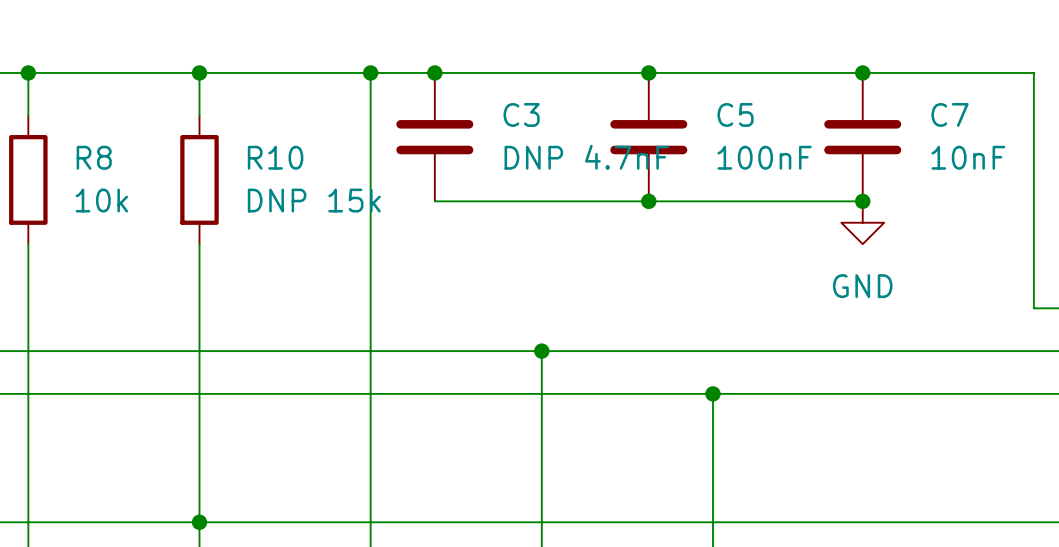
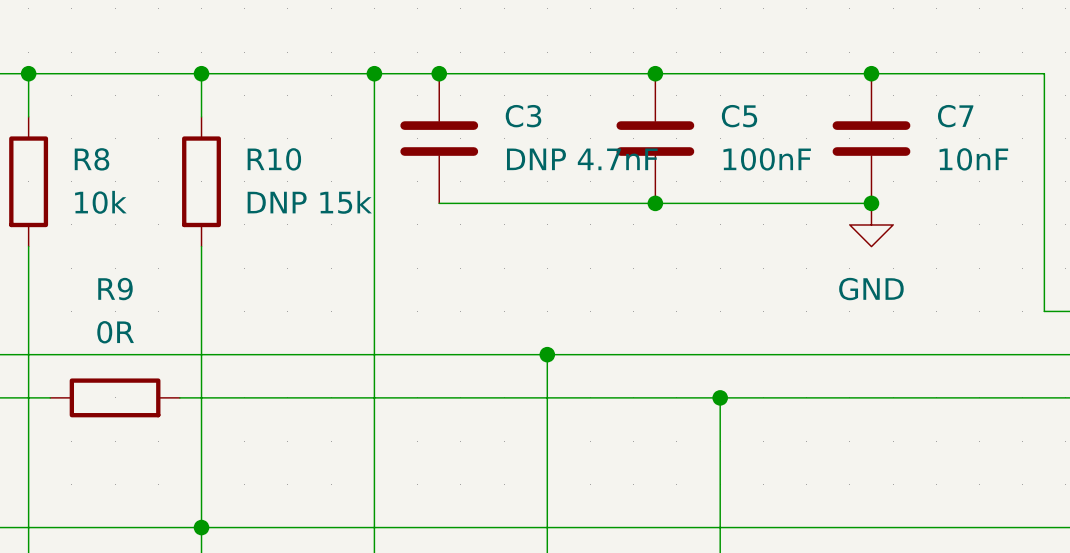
wire: (49, 393) (178, 393) -> none
R9: none -> 0R (115, 397)

